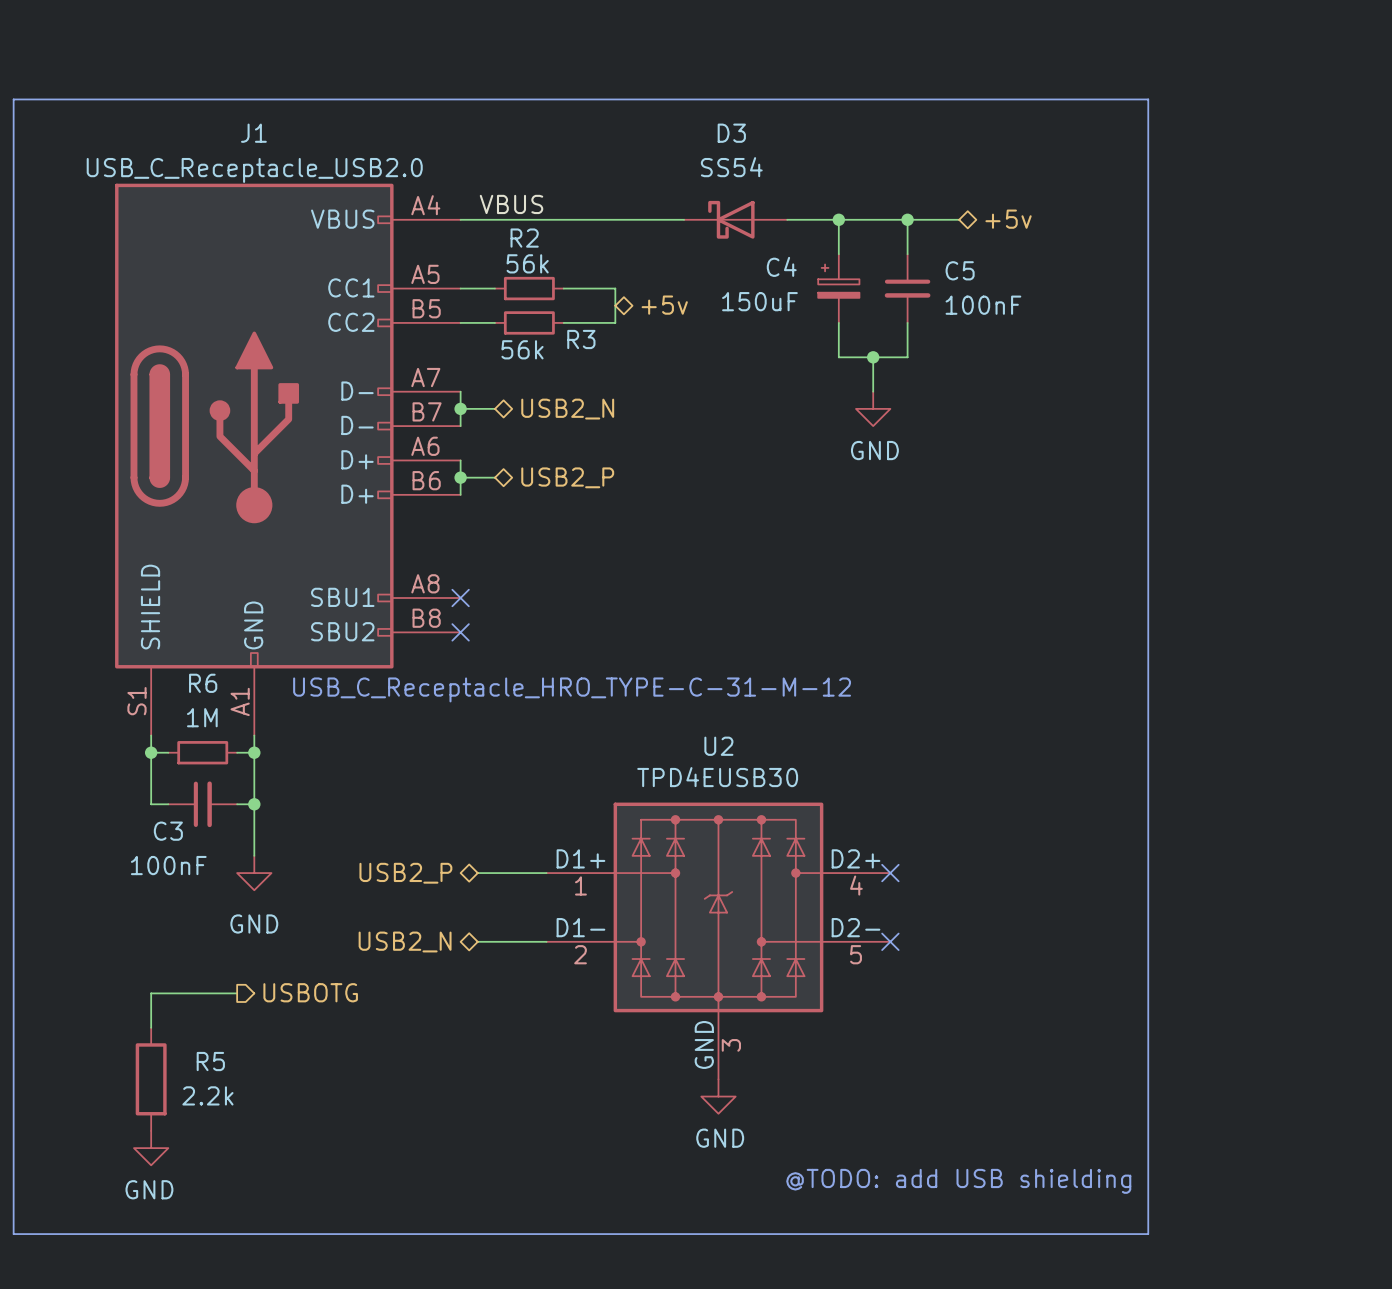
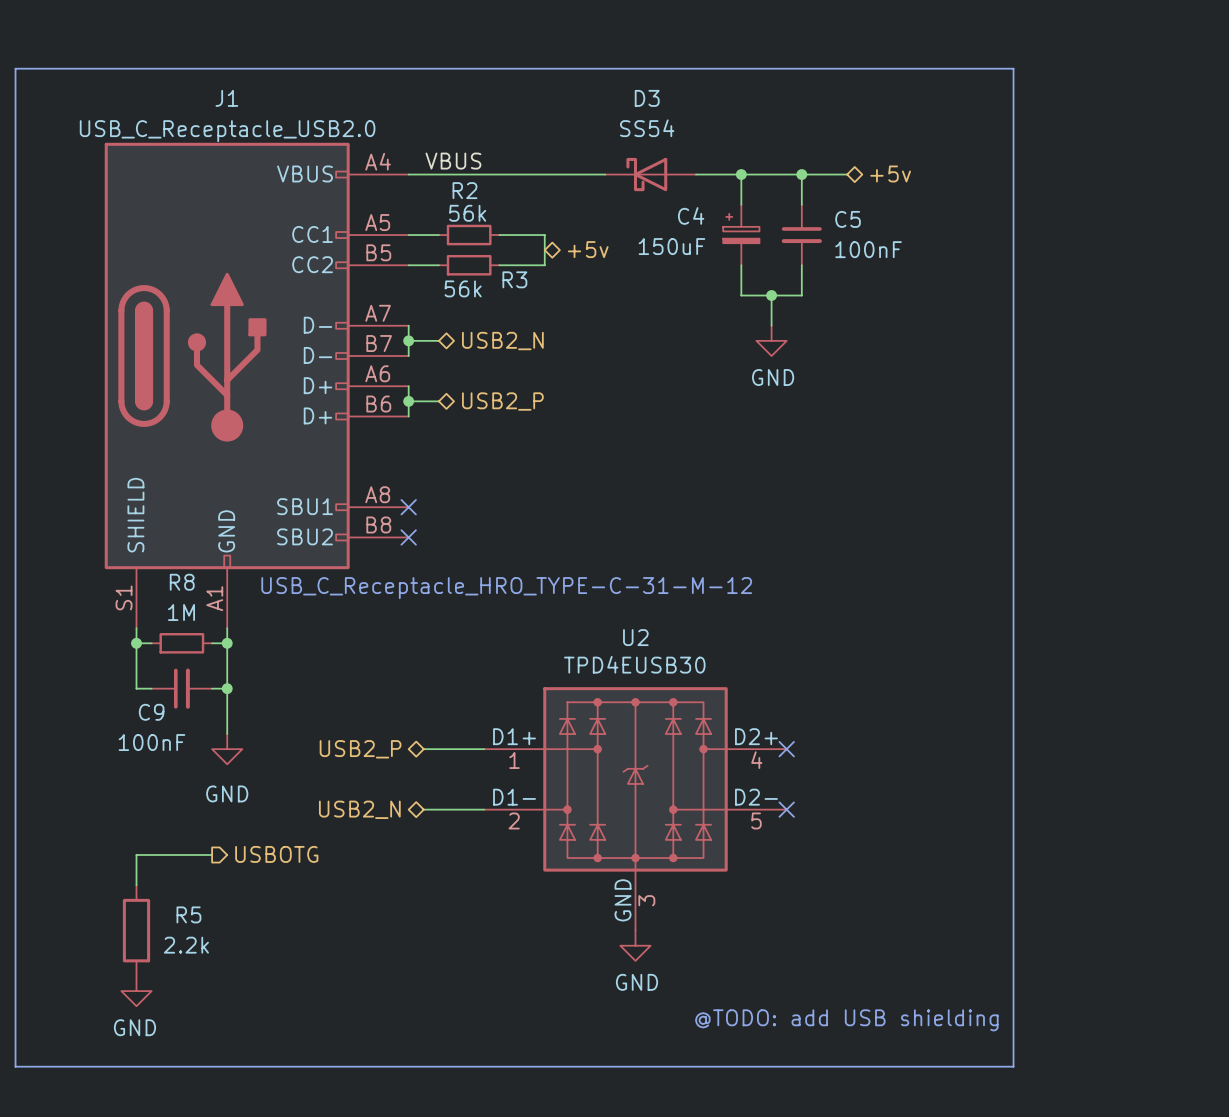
R6 name: R6 (203, 683) -> R8 (182, 582)
C3 name: C3 (168, 831) -> C9 (151, 712)

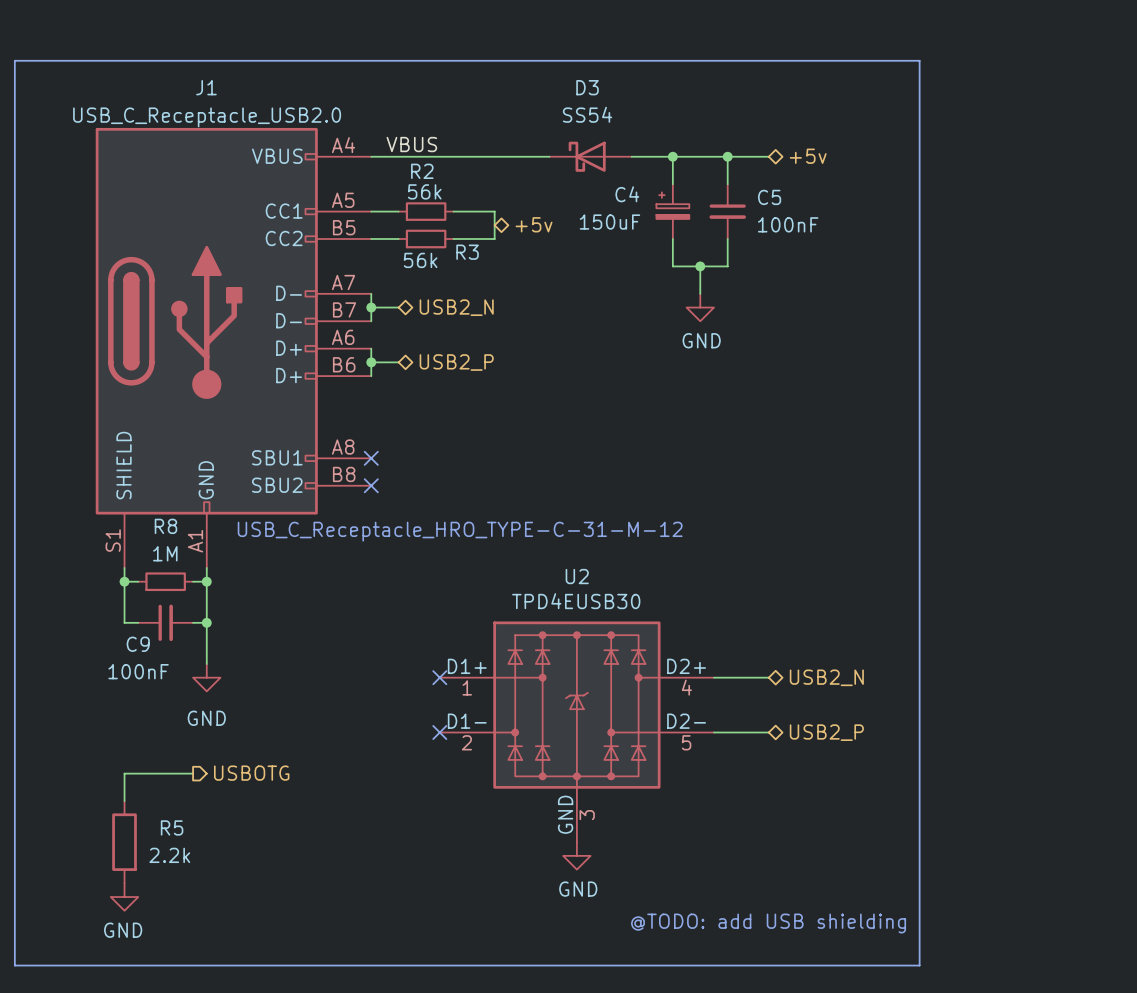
hierarchical label: USB2_P (360, 749) -> none
wire: (423, 749) (484, 749) -> none
no-connect mark: none -> (439, 677)
wire: none -> (713, 677) (768, 677)
no-connect mark: (786, 749) -> none
hierarchical label: none -> USB2_N (826, 677)
hierarchical label: USB2_N (359, 809) -> none
wire: (423, 809) (484, 809) -> none
no-connect mark: none -> (439, 732)
wire: none -> (713, 732) (768, 732)
no-connect mark: (786, 809) -> none
hierarchical label: none -> USB2_P (826, 732)

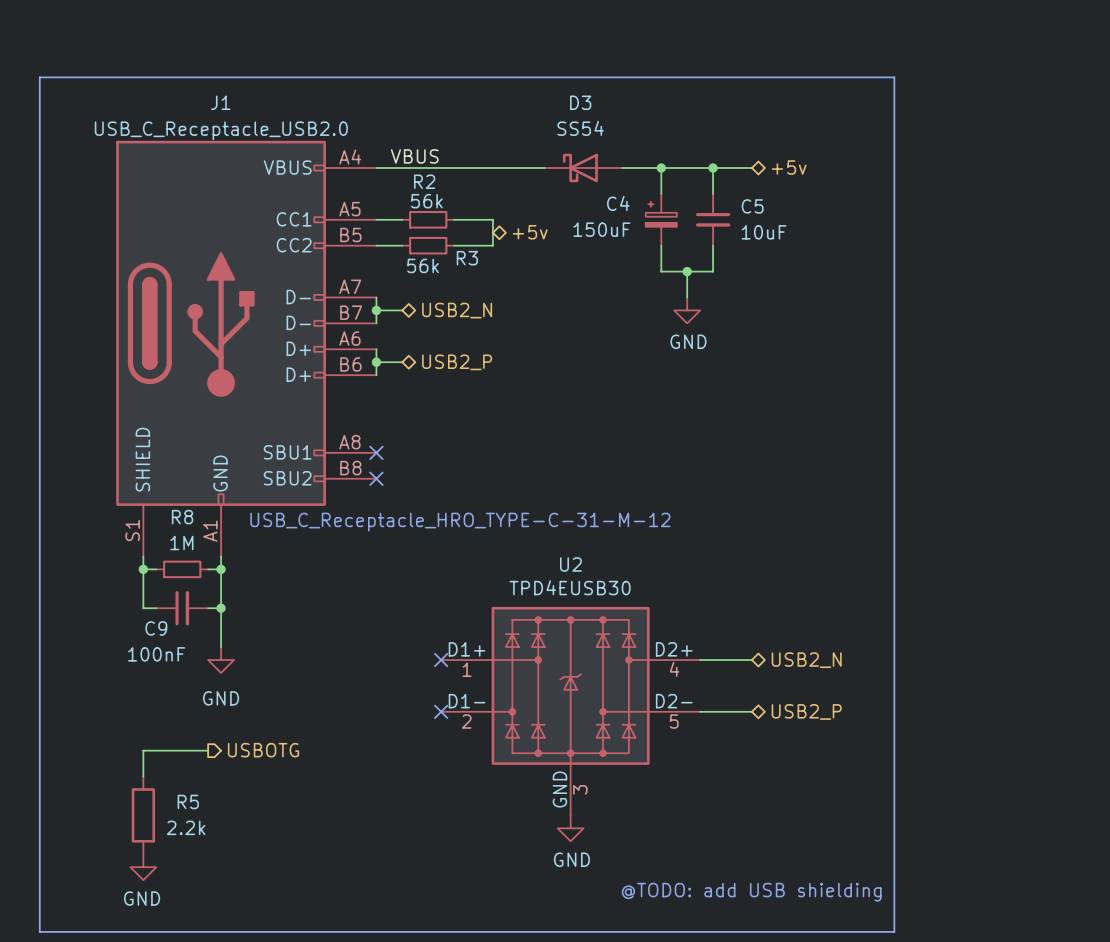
C5 value: 100nF (788, 224) -> 10uF (764, 232)

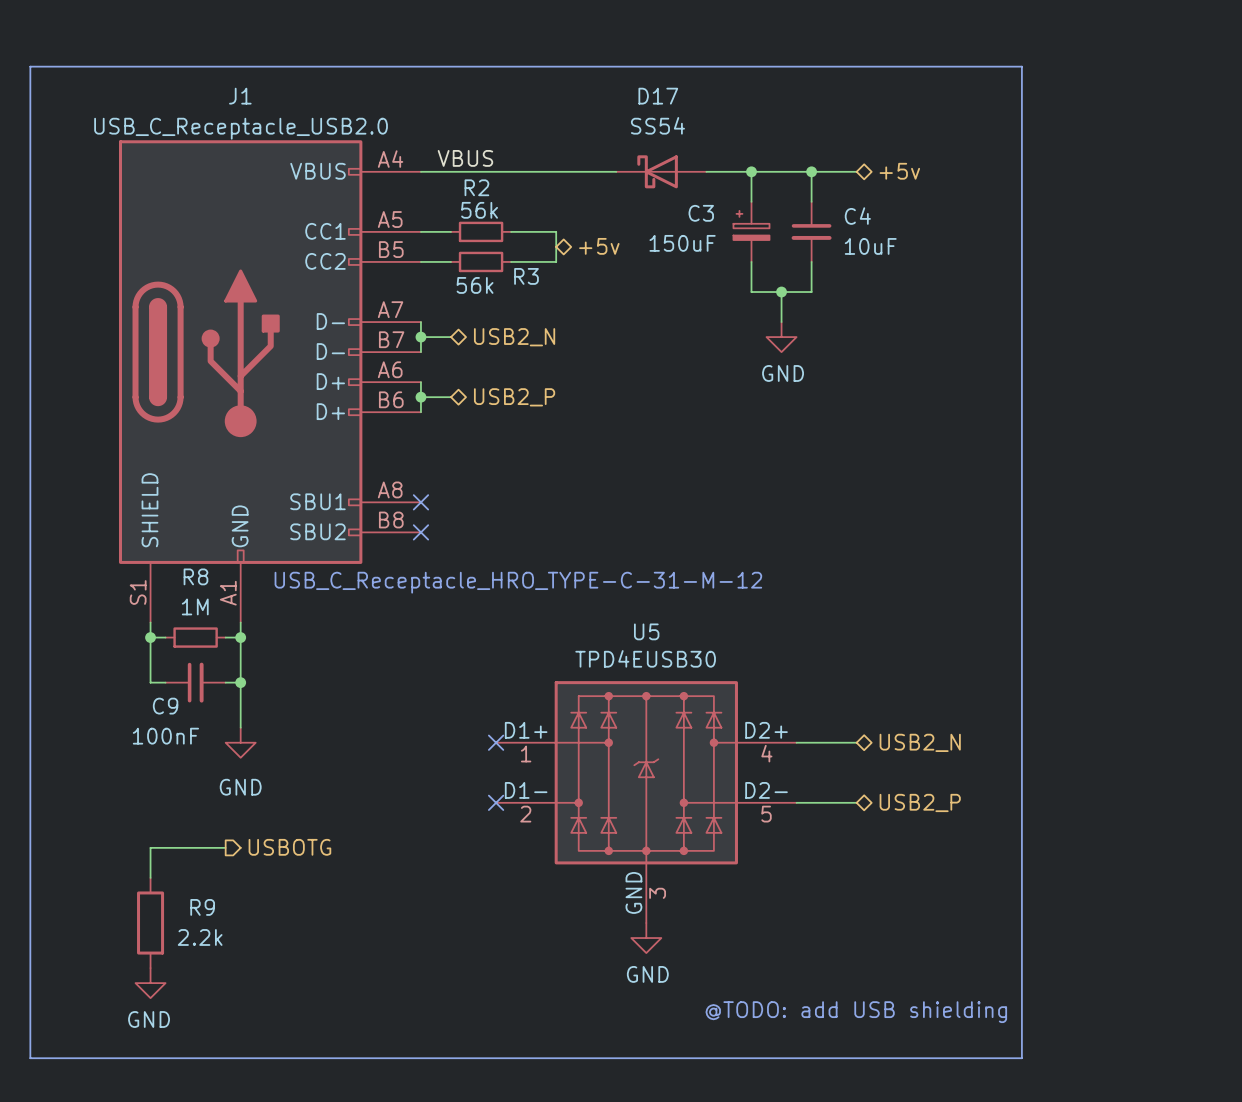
D3 name: D3 (580, 102) -> D17 (658, 96)
C4 name: C4 (618, 203) -> C3 (701, 213)
C5 name: C5 (752, 206) -> C4 (857, 216)
U2 name: U2 (570, 564) -> U5 (646, 631)
R5 name: R5 (188, 801) -> R9 (202, 907)

